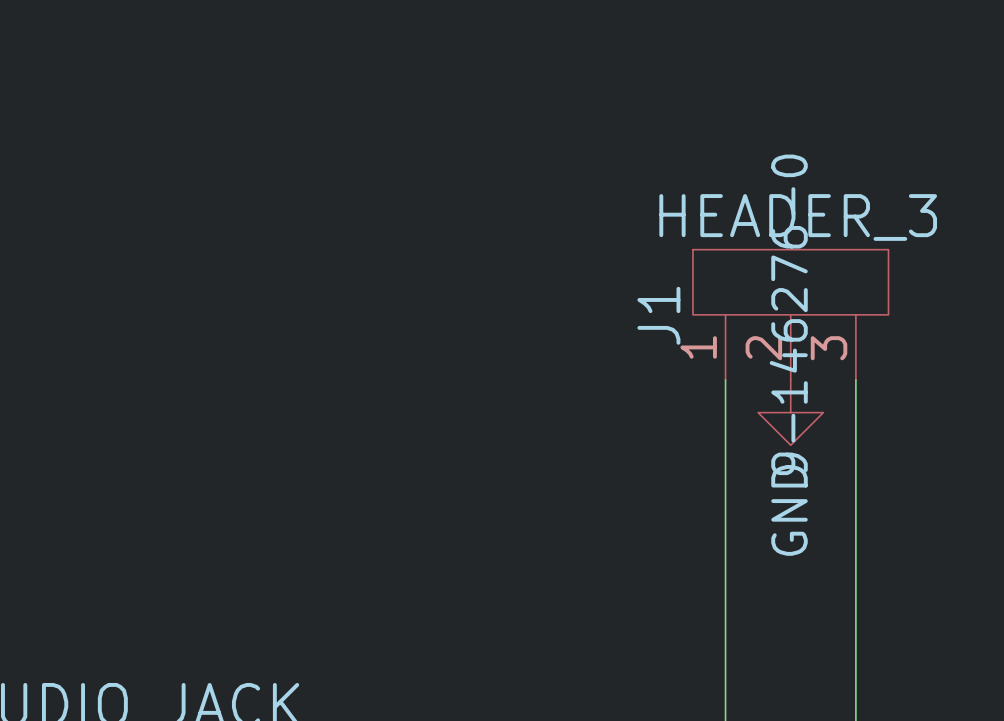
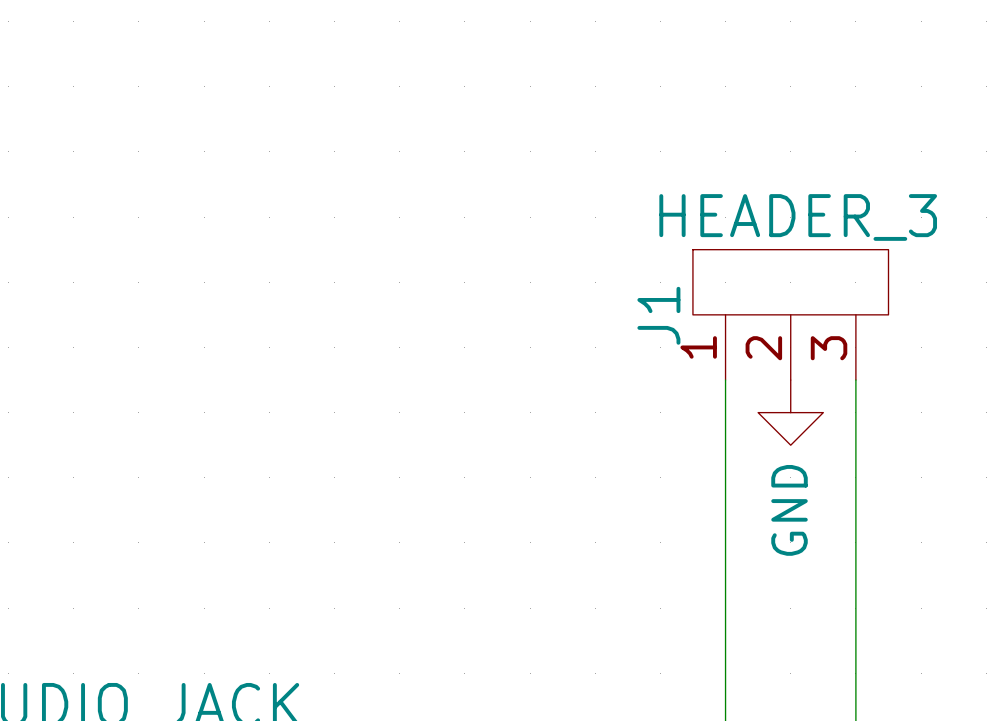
J1 text: 9-146276-0 (788, 314) -> none

